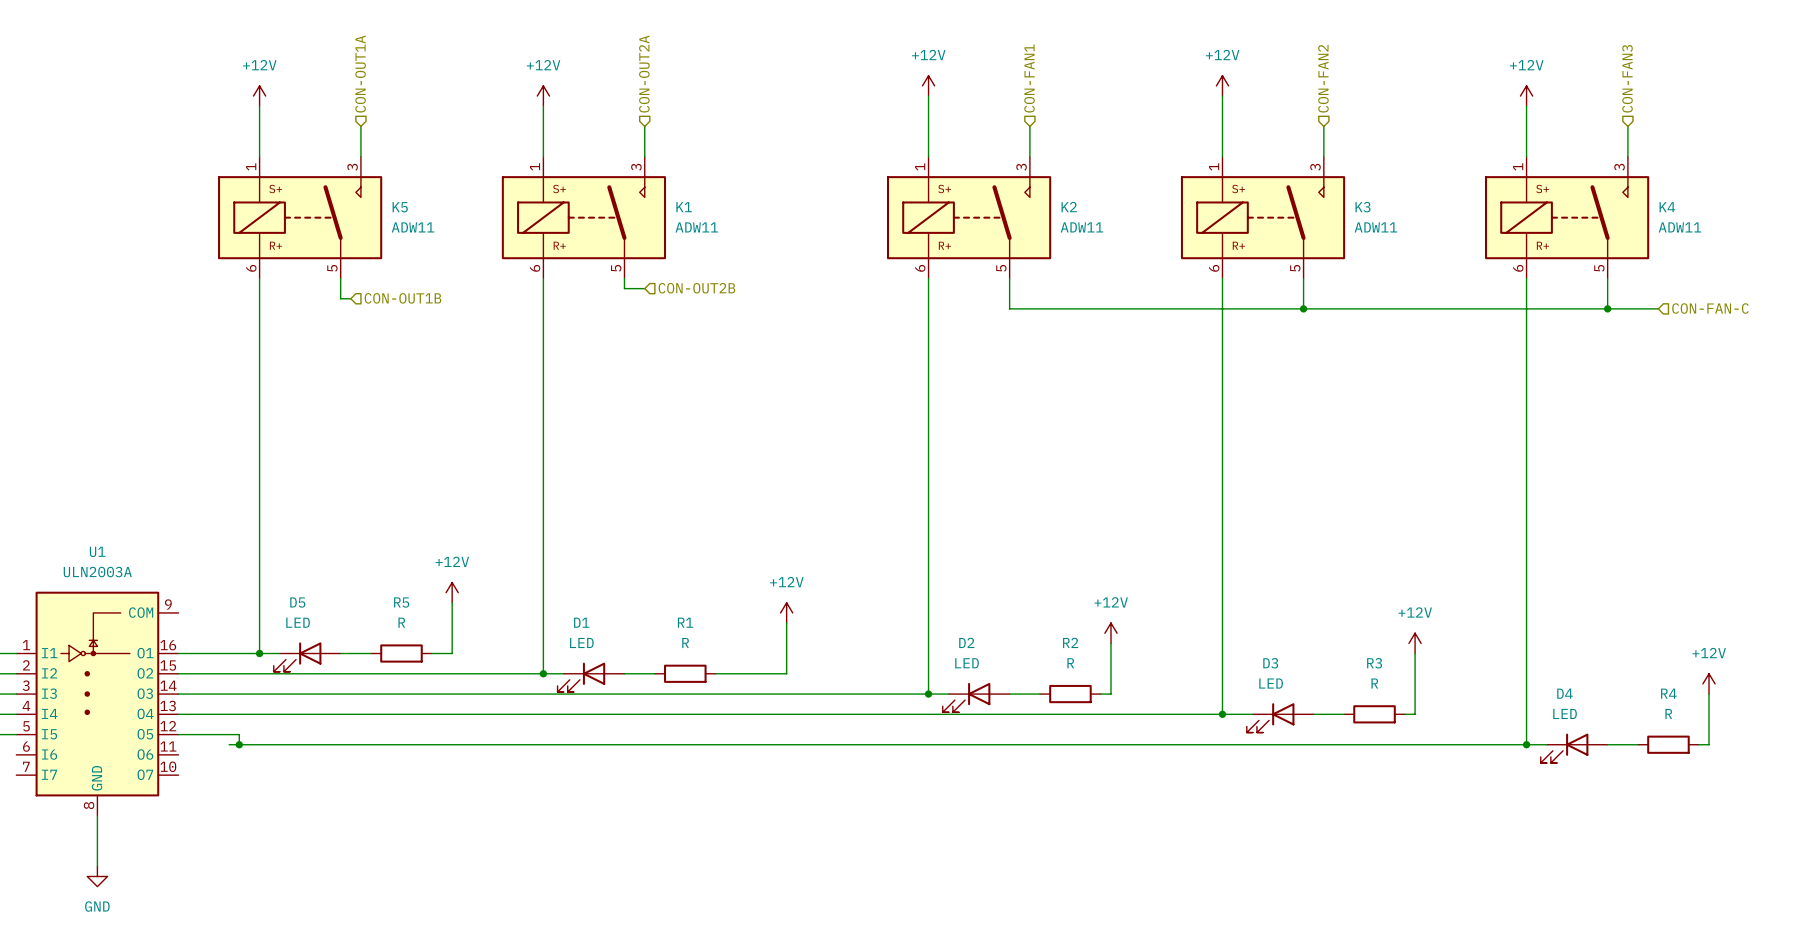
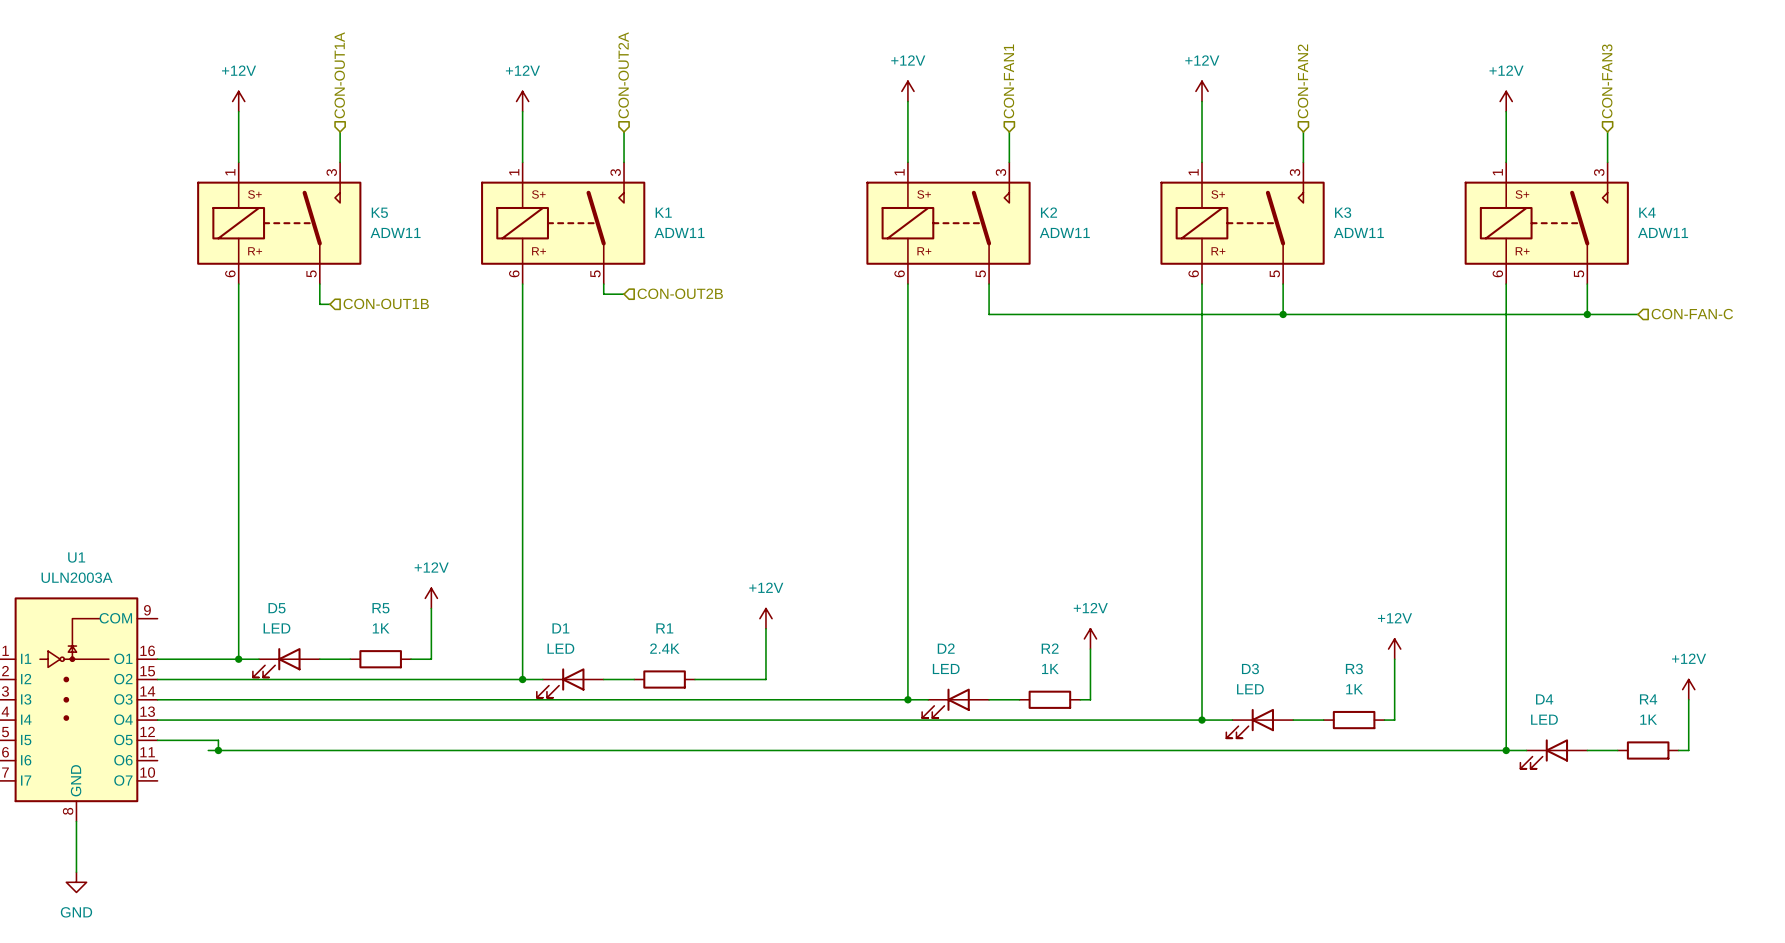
R5 value: R (401, 622) -> 1K (381, 628)
R1 value: R (685, 642) -> 2.4K (664, 648)
R2 value: R (1070, 663) -> 1K (1050, 668)
R3 value: R (1374, 683) -> 1K (1354, 689)
R4 value: R (1668, 713) -> 1K (1648, 719)

